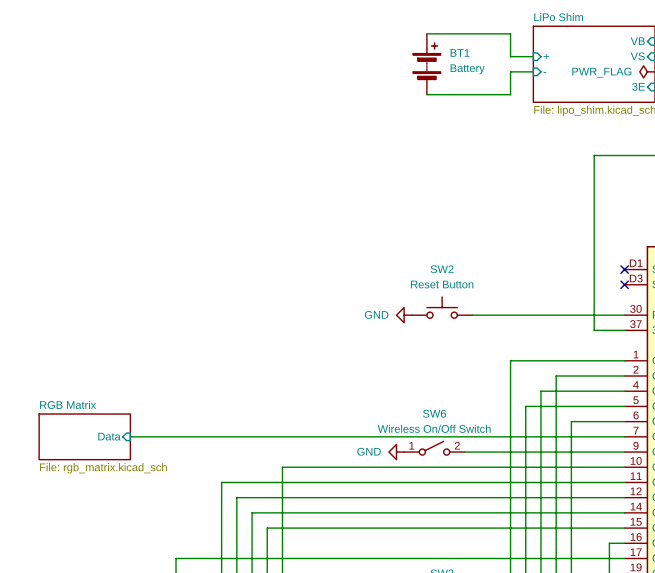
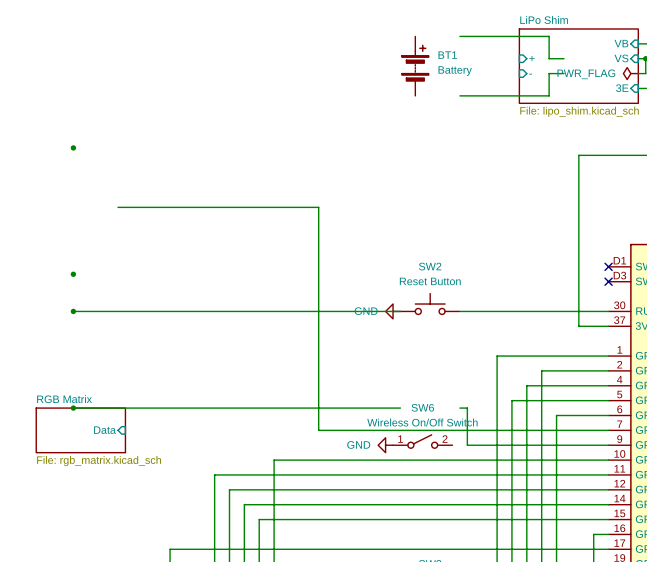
wire: (426, 33) (472, 33) -> none
wire: (510, 33) (510, 56) (533, 56) -> (497, 36) (549, 36) (549, 58) (563, 58)
wire: (533, 71) (510, 71) (510, 94) -> (563, 73) (549, 73) (549, 95) (497, 95)
wire: (426, 94) (472, 94) -> none
junction: none -> (73, 147)
junction: none -> (73, 274)
wire: none -> (73, 311) (400, 311)
junction: none -> (73, 311)
wire: none -> (73, 408) (400, 408)
junction: none -> (73, 408)
wire: (130, 436) (328, 436) -> (118, 207) (318, 207) (318, 430)
wire: (464, 452) (480, 452) -> (459, 408) (467, 408) (467, 445)

